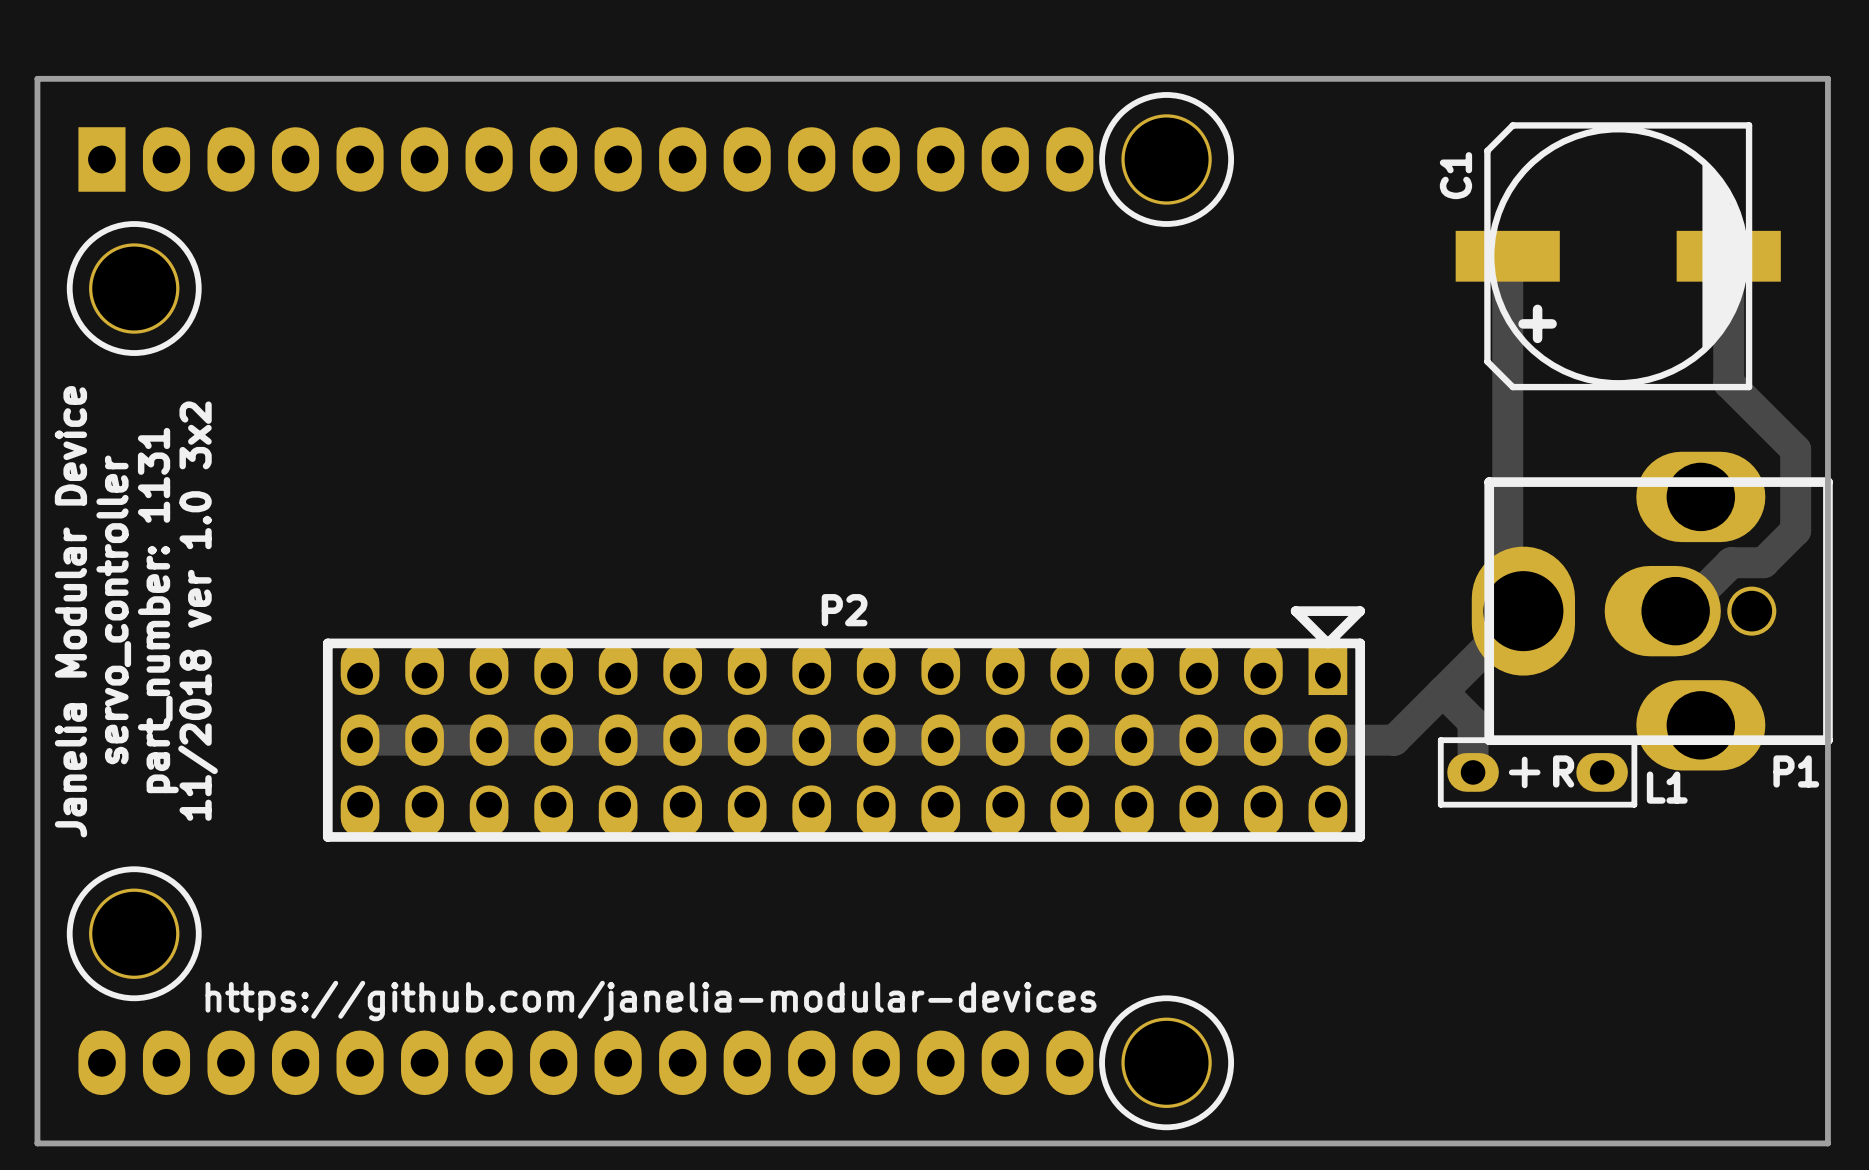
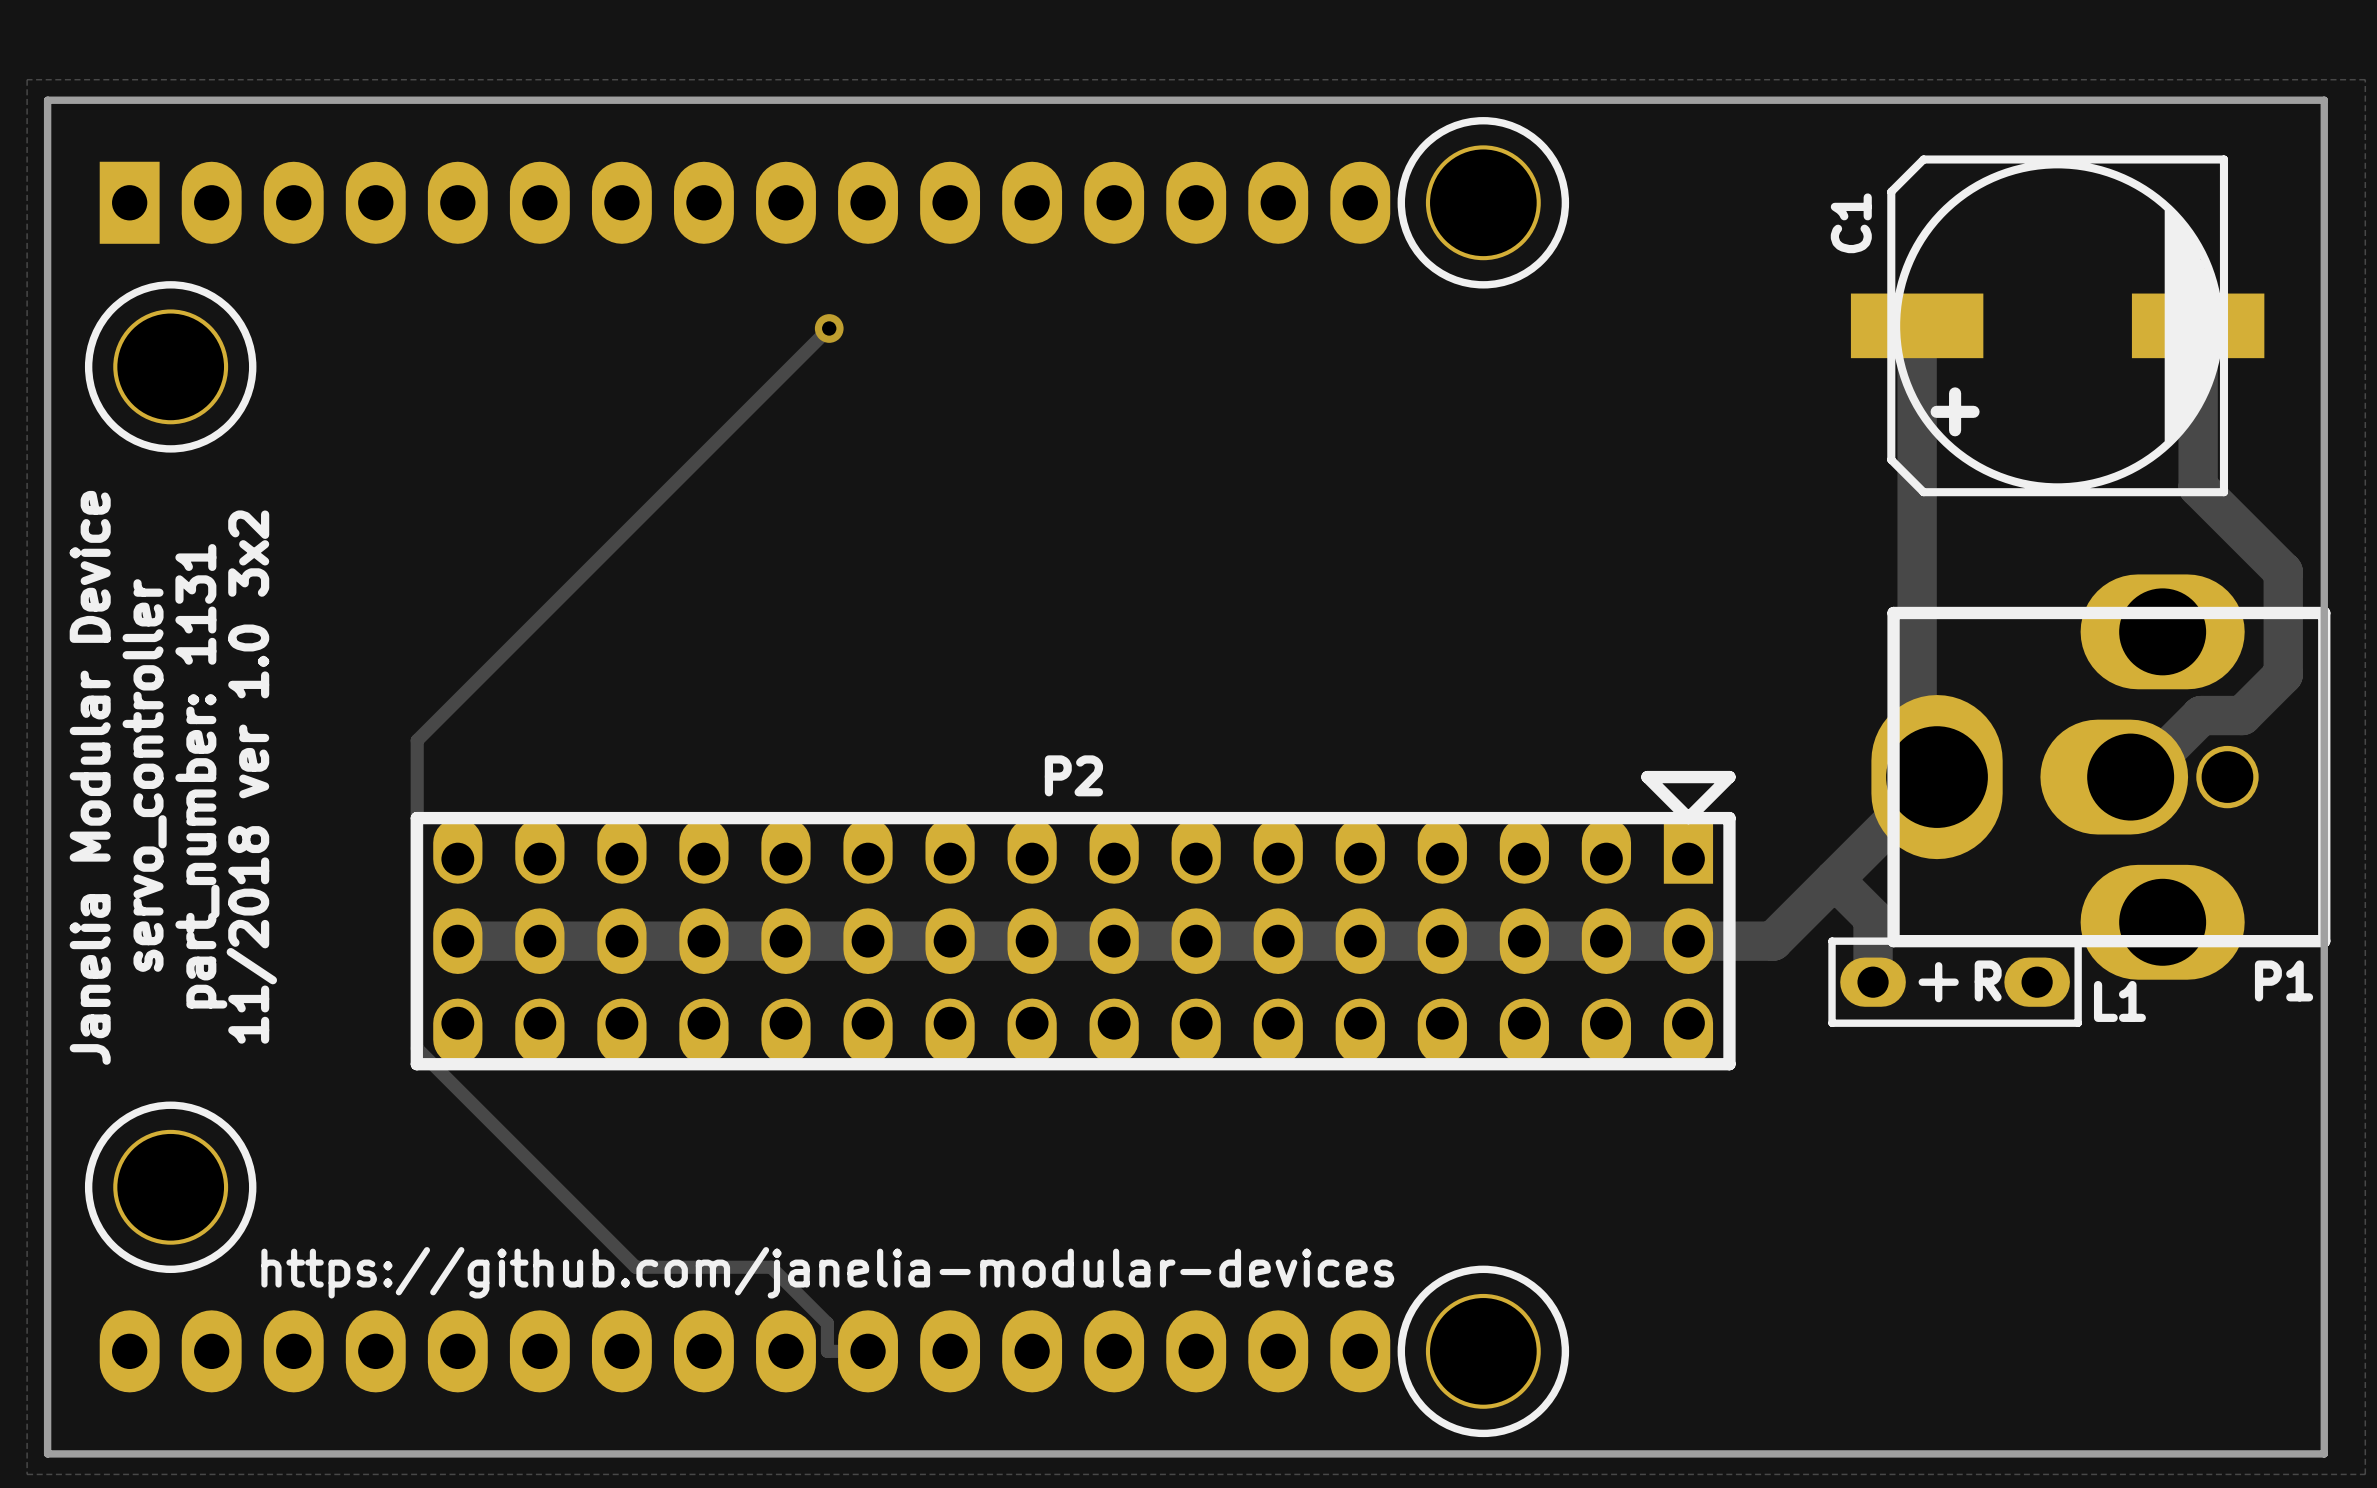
zone outline: none -> (27, 79) (27, 1474) (2365, 1474) (2365, 79) (27, 79)
track: none -> (829, 328) (417, 740) (417, 1048) (635, 1267) (771, 1267) (827, 1323) (827, 1351) (868, 1351)
via: none -> (829, 328)

